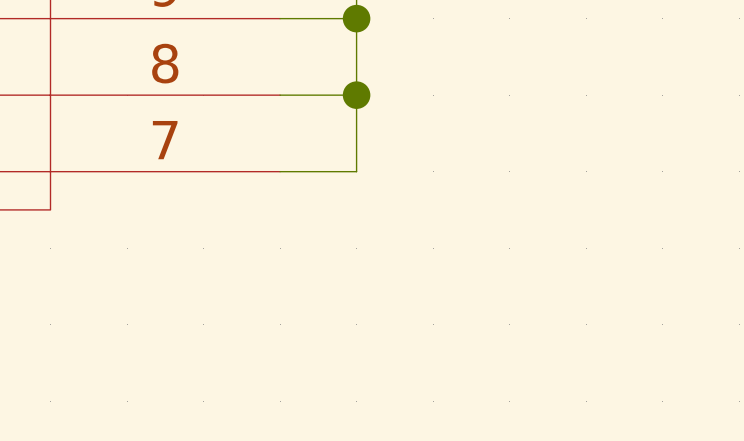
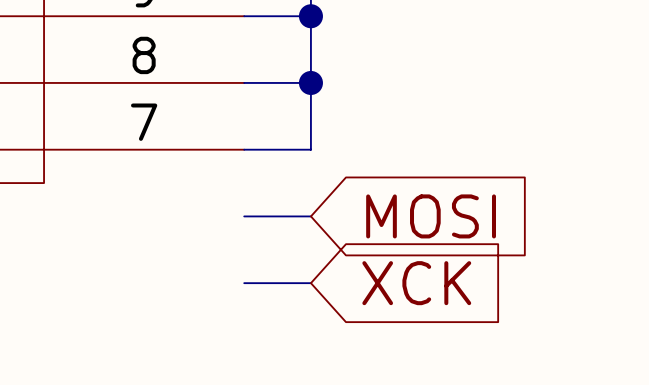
wire: none -> (244, 216) (310, 216)
global label: none -> MOSI (431, 216)
wire: none -> (244, 283) (310, 283)
global label: none -> XCK (416, 283)

